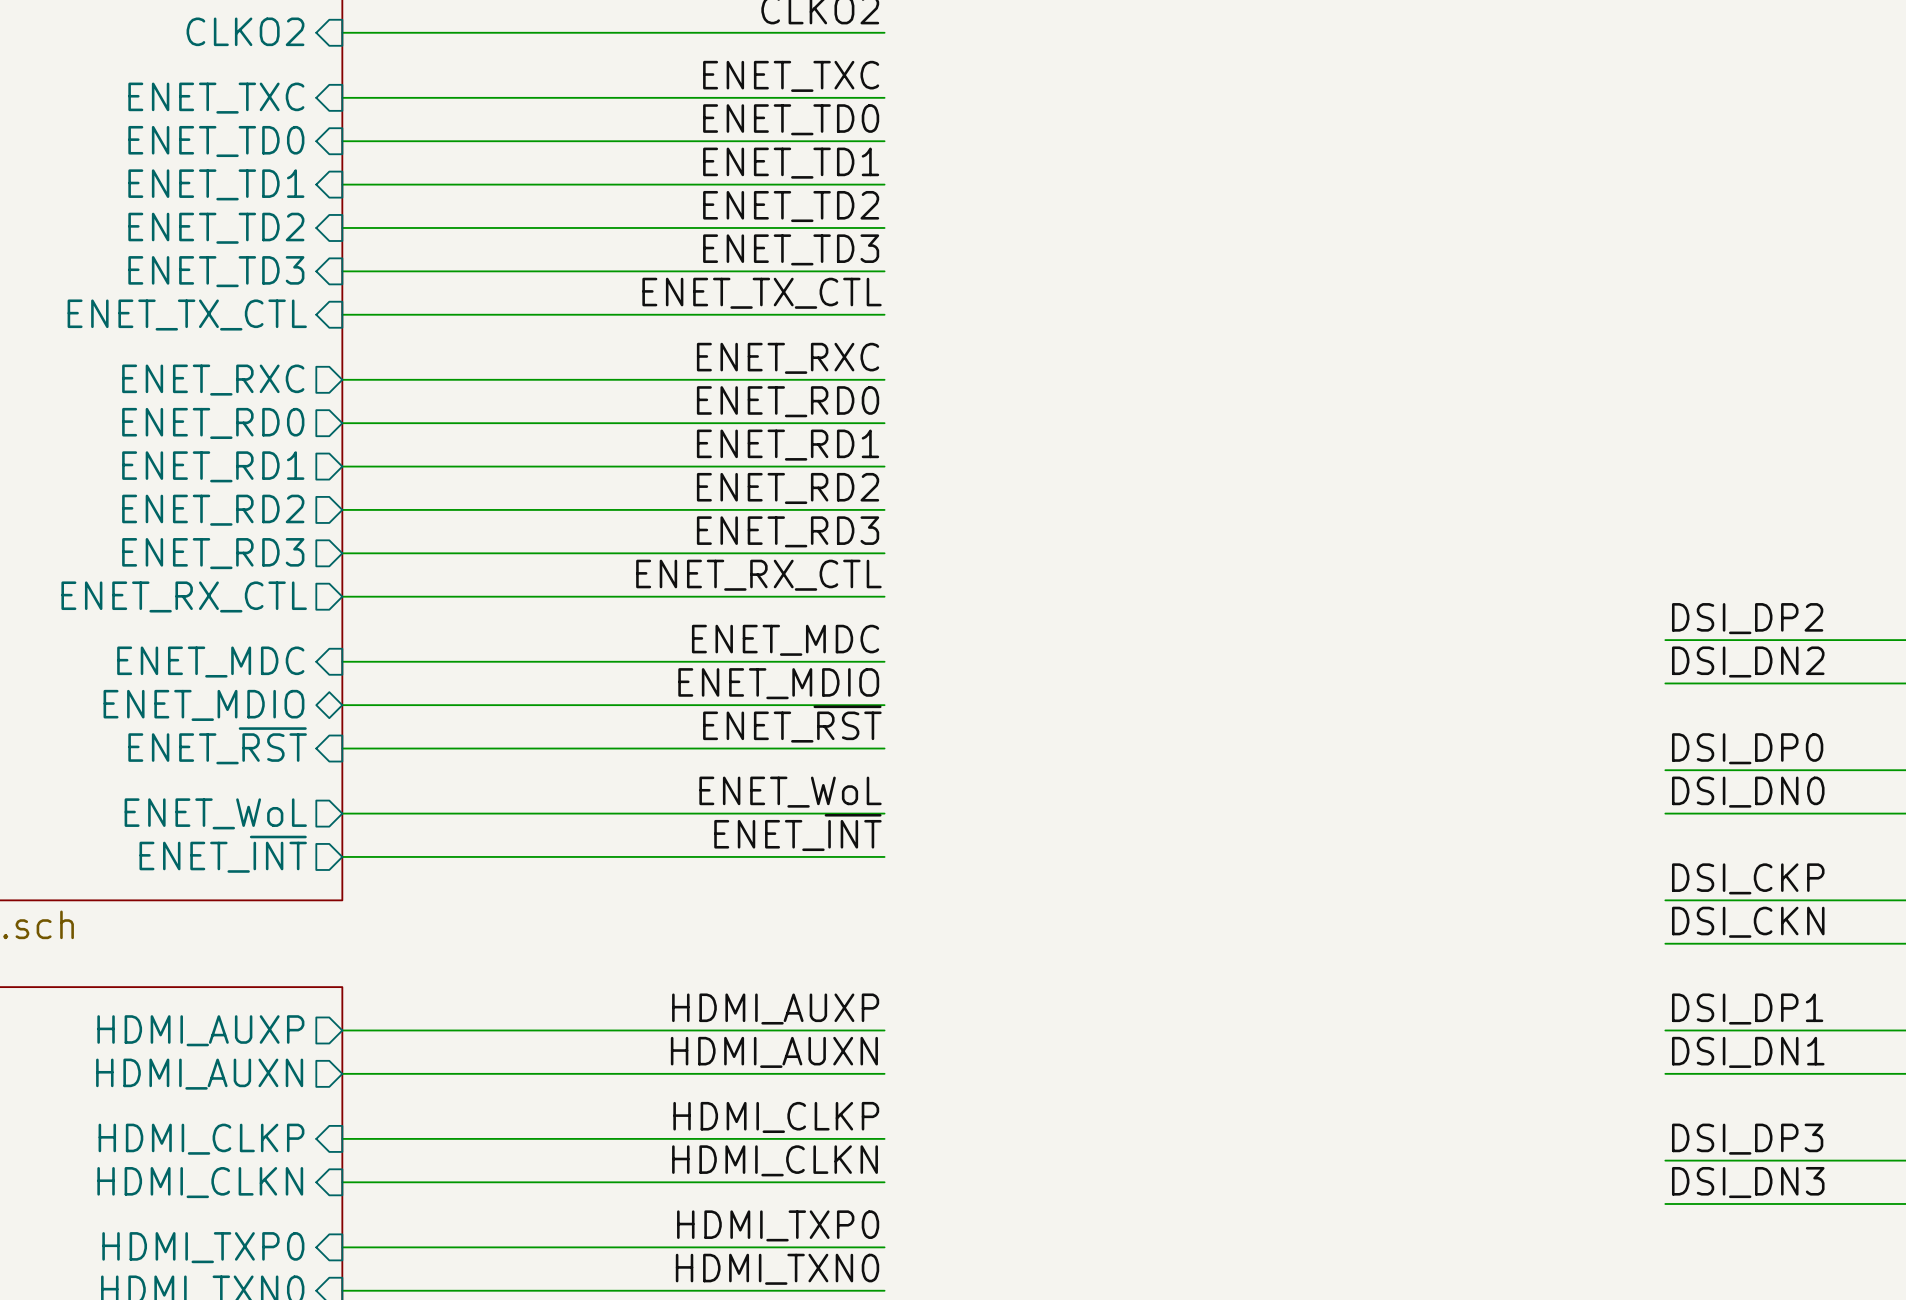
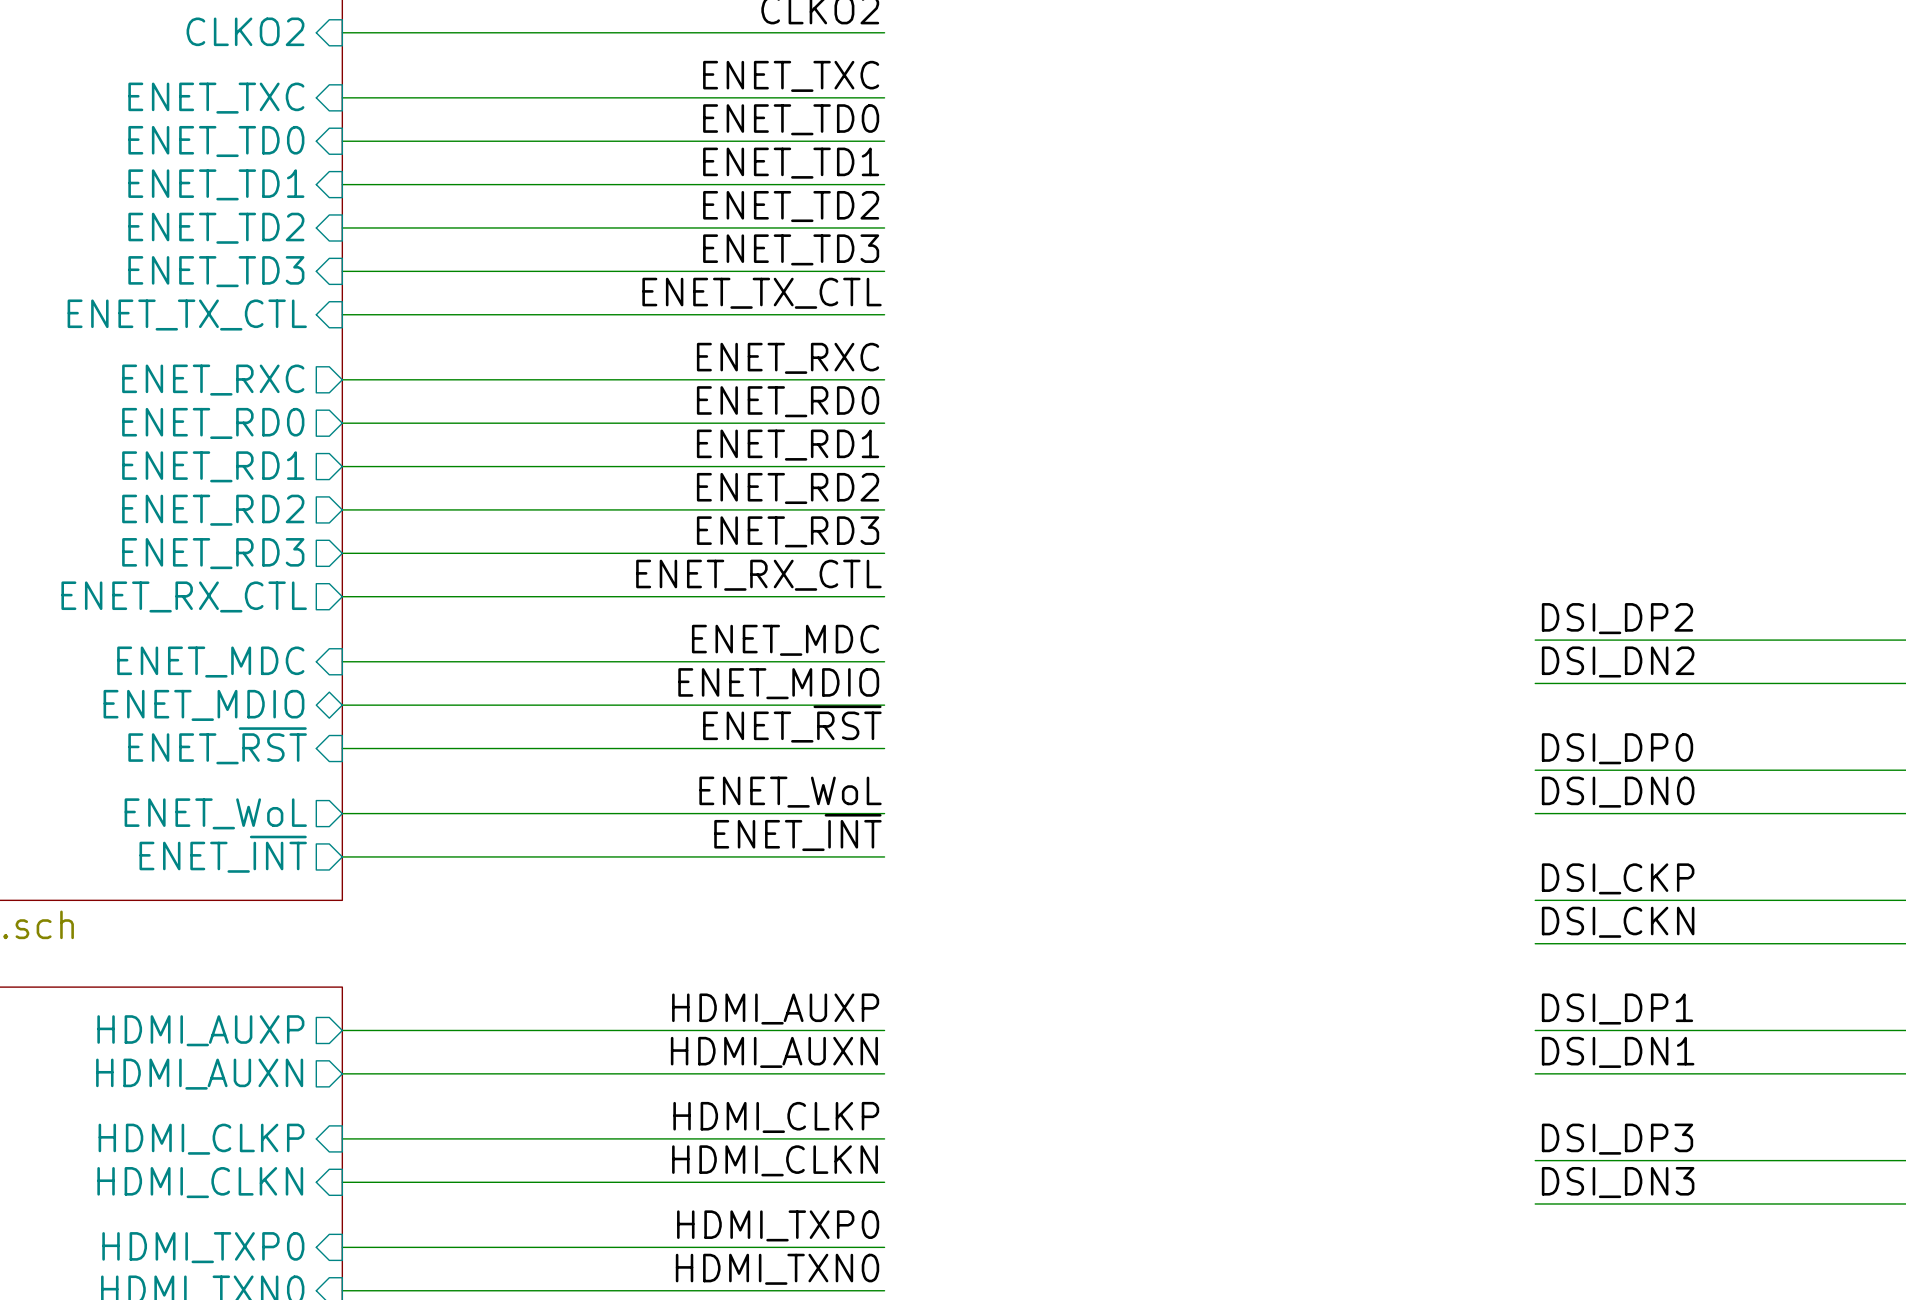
label position: DSI_DP2 (1747, 618) -> DSI_DP2 (1617, 618)
wire: none -> (1535, 640) (1665, 640)
label position: DSI_DN2 (1748, 661) -> DSI_DN2 (1618, 661)
wire: none -> (1535, 683) (1665, 683)
label position: DSI_DP0 (1747, 748) -> DSI_DP0 (1617, 748)
wire: none -> (1535, 770) (1665, 770)
label position: DSI_DN0 (1748, 792) -> DSI_DN0 (1618, 792)
wire: none -> (1535, 813) (1665, 813)
label position: DSI_CKP (1748, 878) -> DSI_CKP (1618, 878)
wire: none -> (1535, 900) (1665, 900)
label position: DSI_CKN (1748, 922) -> DSI_CKN (1618, 922)
wire: none -> (1535, 943) (1665, 943)
label position: DSI_DP1 (1747, 1009) -> DSI_DP1 (1617, 1009)
wire: none -> (1535, 1030) (1665, 1030)
label position: DSI_DN1 (1748, 1052) -> DSI_DN1 (1618, 1052)
wire: none -> (1535, 1073) (1665, 1073)
label position: DSI_DP3 (1747, 1139) -> DSI_DP3 (1617, 1139)
wire: none -> (1535, 1160) (1665, 1160)
label position: DSI_DN3 (1748, 1182) -> DSI_DN3 (1618, 1182)
wire: none -> (1535, 1203) (1665, 1203)

